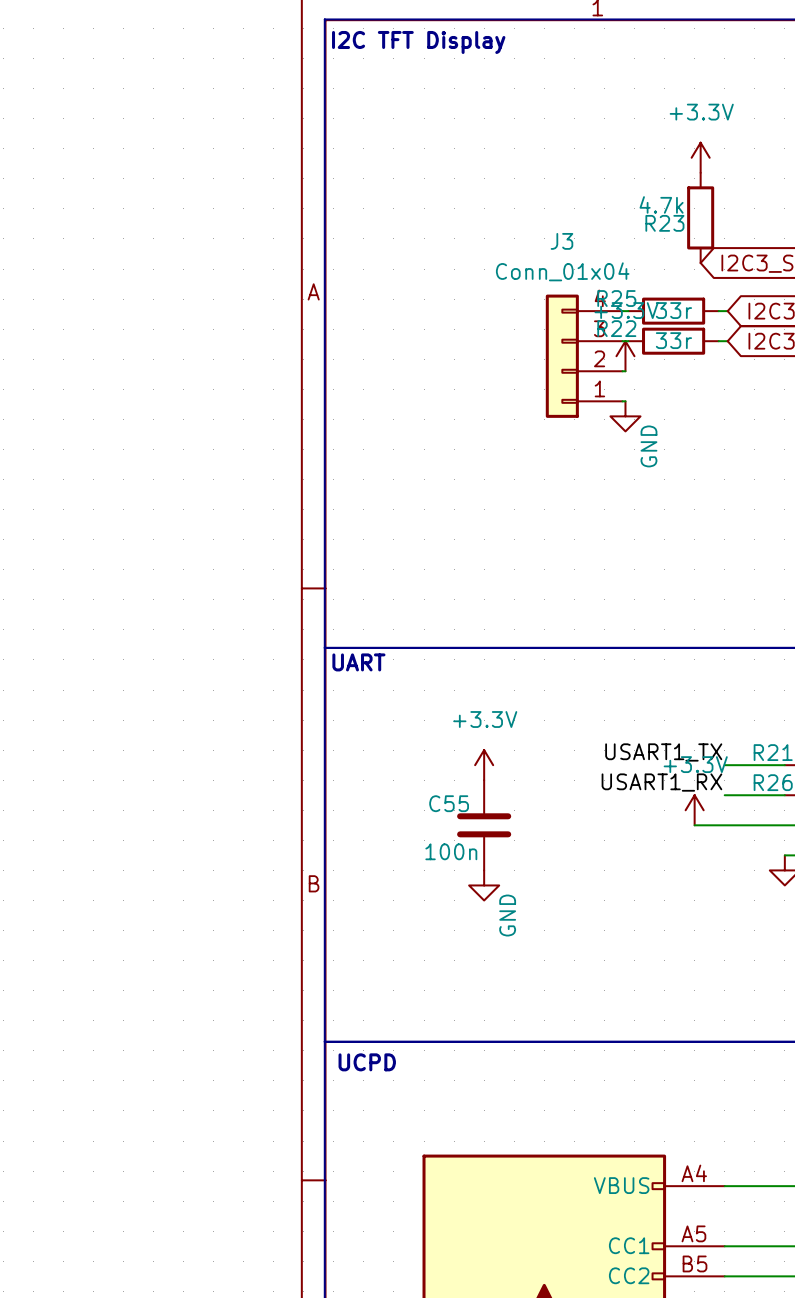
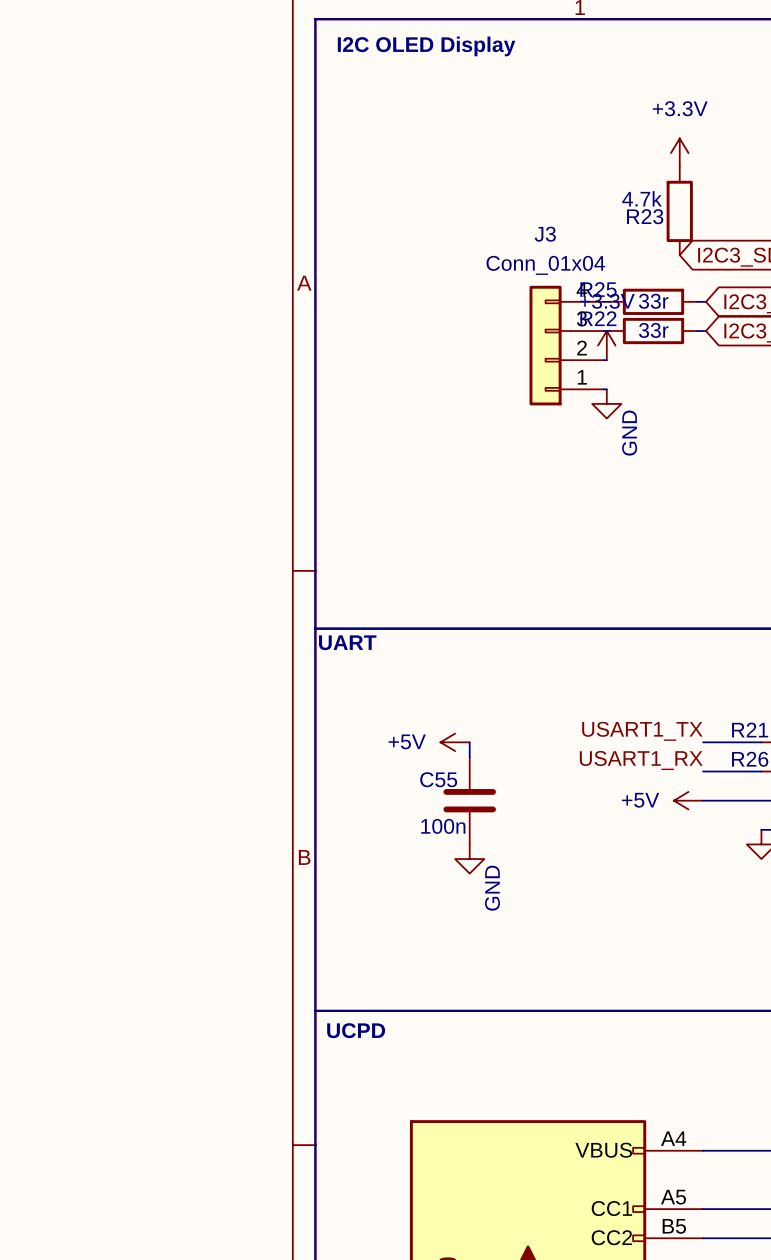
text: I2C TFT Display (418, 42) -> I2C OLED Display (426, 46)
power symbol: none -> +5V (455, 742)
power symbol: +3.3V (484, 765) -> none
power symbol: +3.3V (694, 810) -> none
power symbol: none -> +5V (688, 800)

